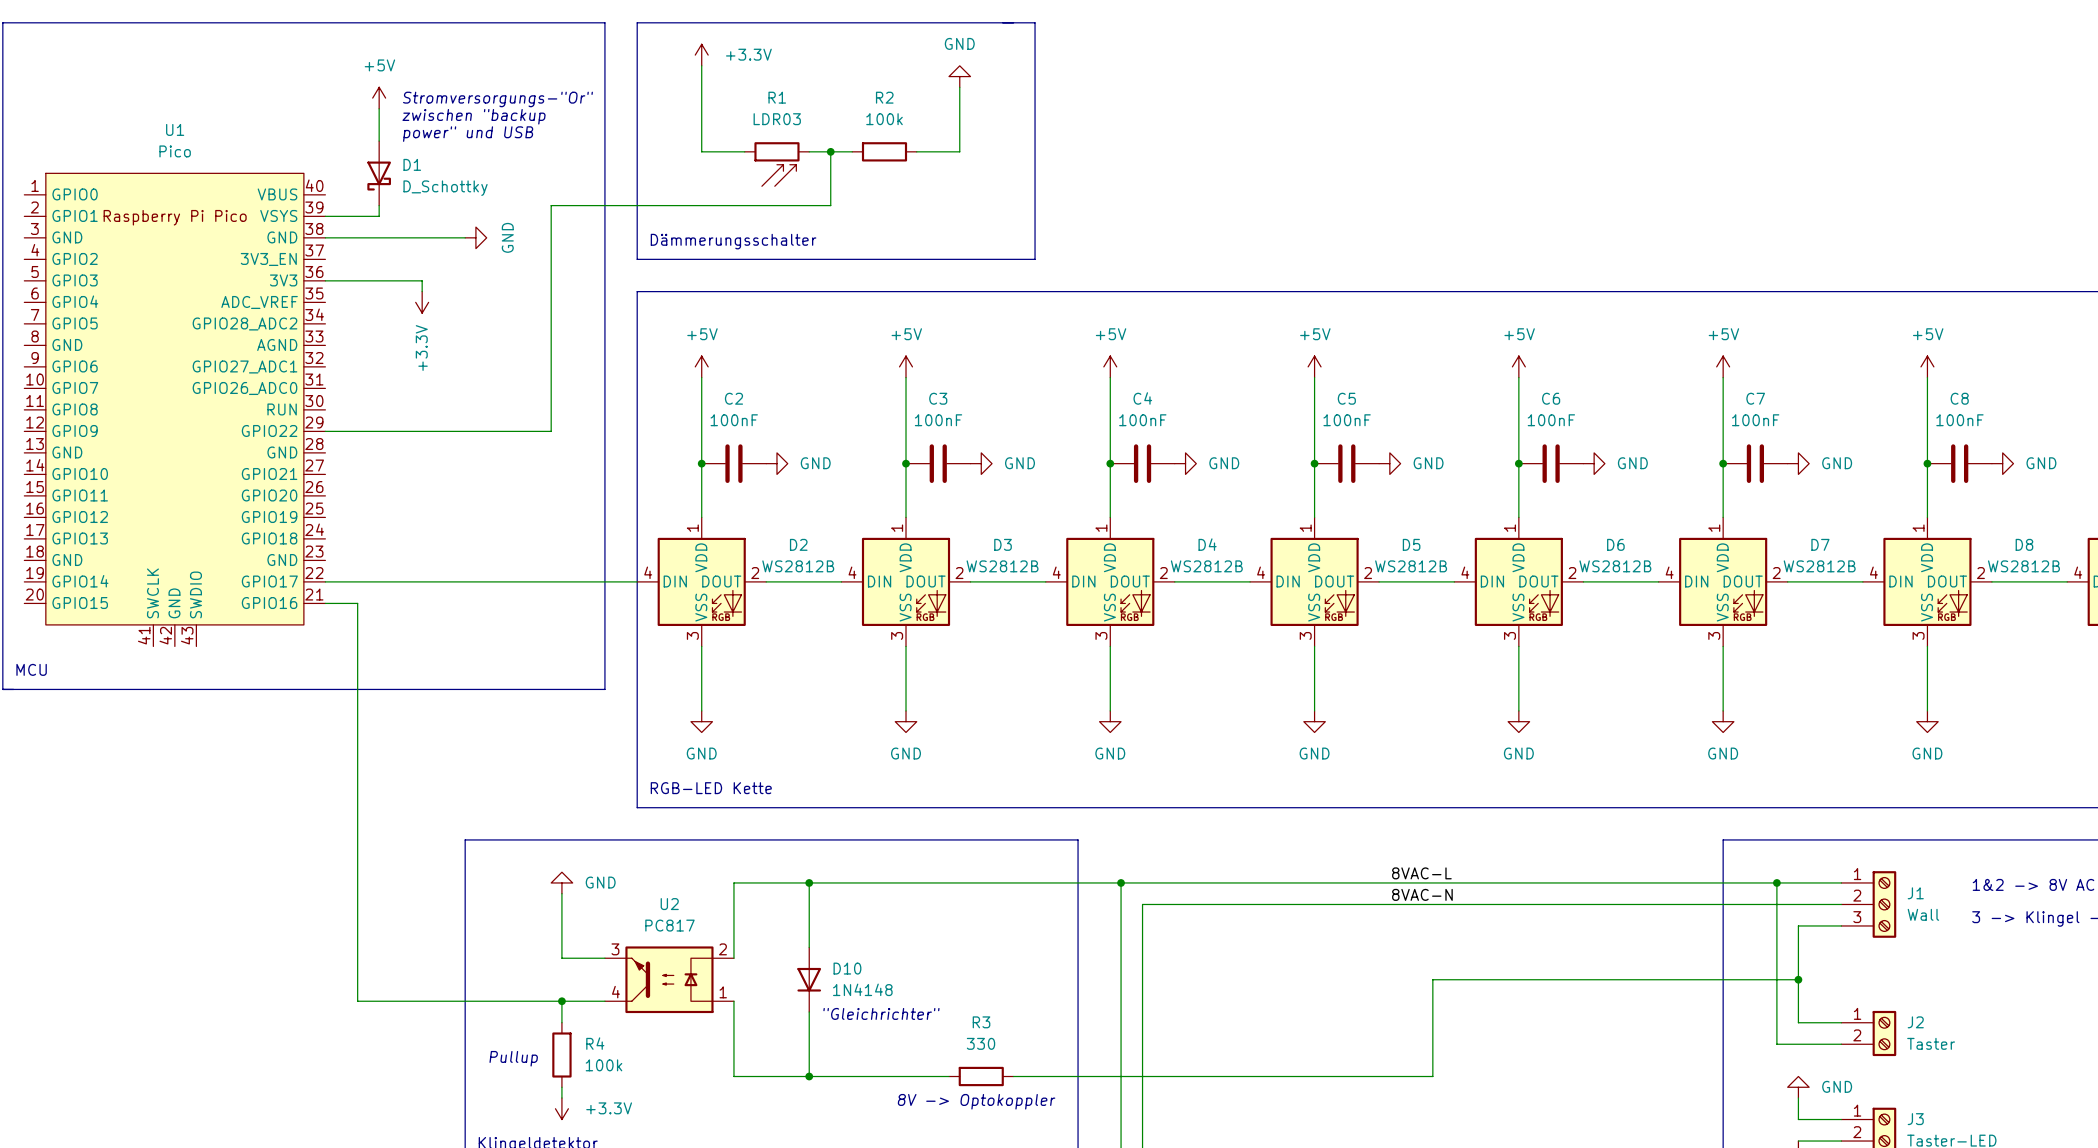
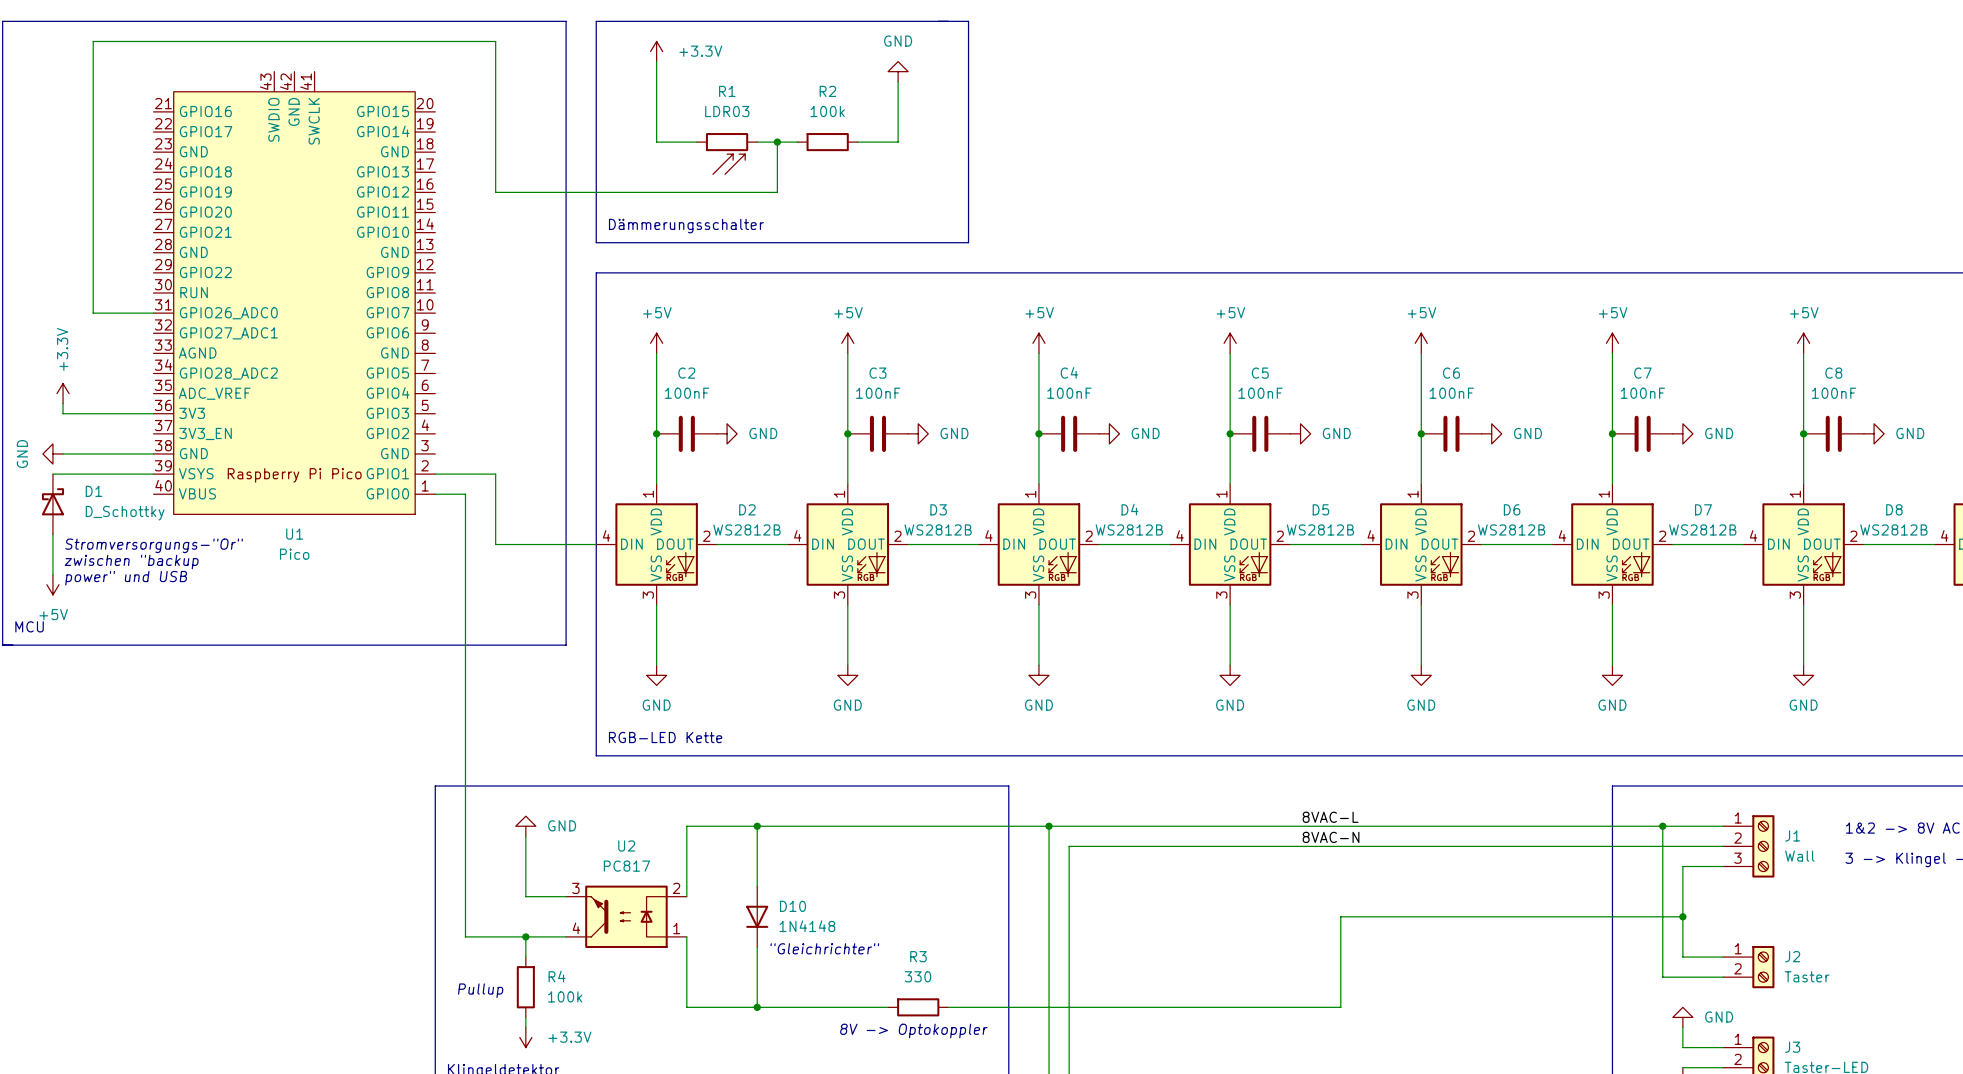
power symbol: +5V (379, 98) -> none
text: Stromversorgungs-"Or" (497, 99) -> none
text: zwischen "backup (474, 116) -> none
U1 name position: U1 (175, 129) -> U1 (294, 534)
text: power" und USB (468, 134) -> none
U1 value position: Pico (175, 151) -> Pico (294, 554)
D1 position: (379, 173) -> (52, 504)
D1 rotation: 0° (379, 176) -> 180° (52, 501)
wire: (551, 205) (551, 431) (325, 431) -> (515, 192) (495, 192) (495, 41) (93, 41) (93, 313) (153, 313)
power symbol: GND (475, 237) -> none
power symbol: +3.3V (422, 302) -> none
U1 rotation: 0° (174, 399) -> 180° (294, 303)
power symbol: none -> +3.3V (63, 393)
power symbol: none -> GND (52, 453)
wire: (325, 581) (529, 581) -> (435, 474) (495, 474) (495, 544)
text: none -> Stromversorgungs-"Or" (154, 545)
text: none -> zwischen "backup (131, 562)
wire: (325, 603) (357, 603) (357, 1001) (497, 1001) -> (435, 494) (465, 494) (465, 936)
text: none -> power" und USB (126, 578)
power symbol: none -> +5V (52, 584)

